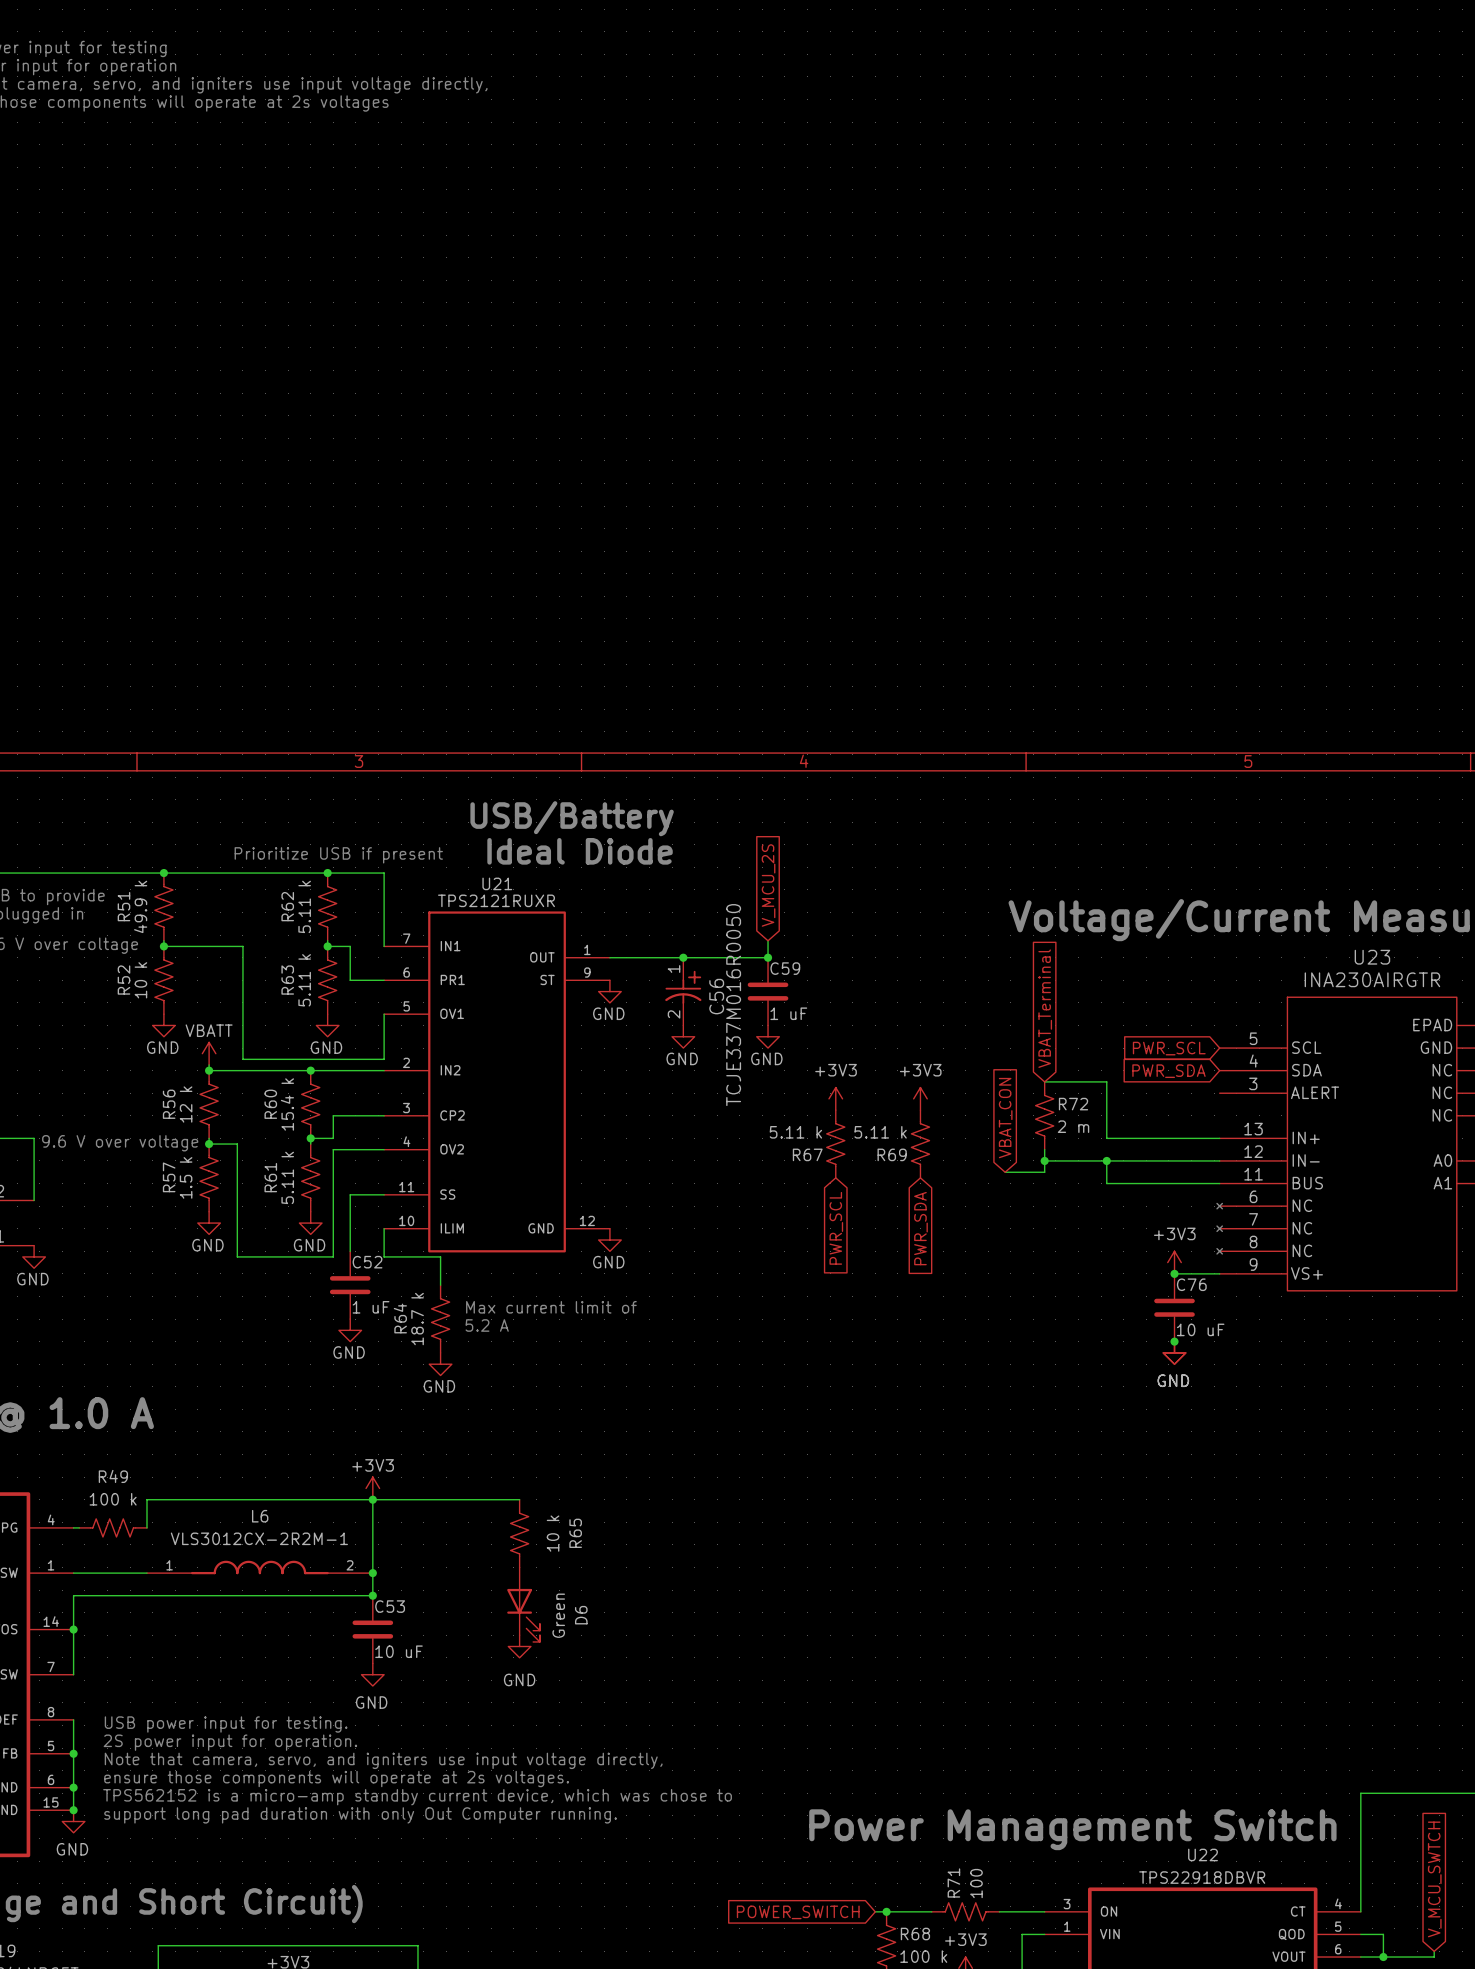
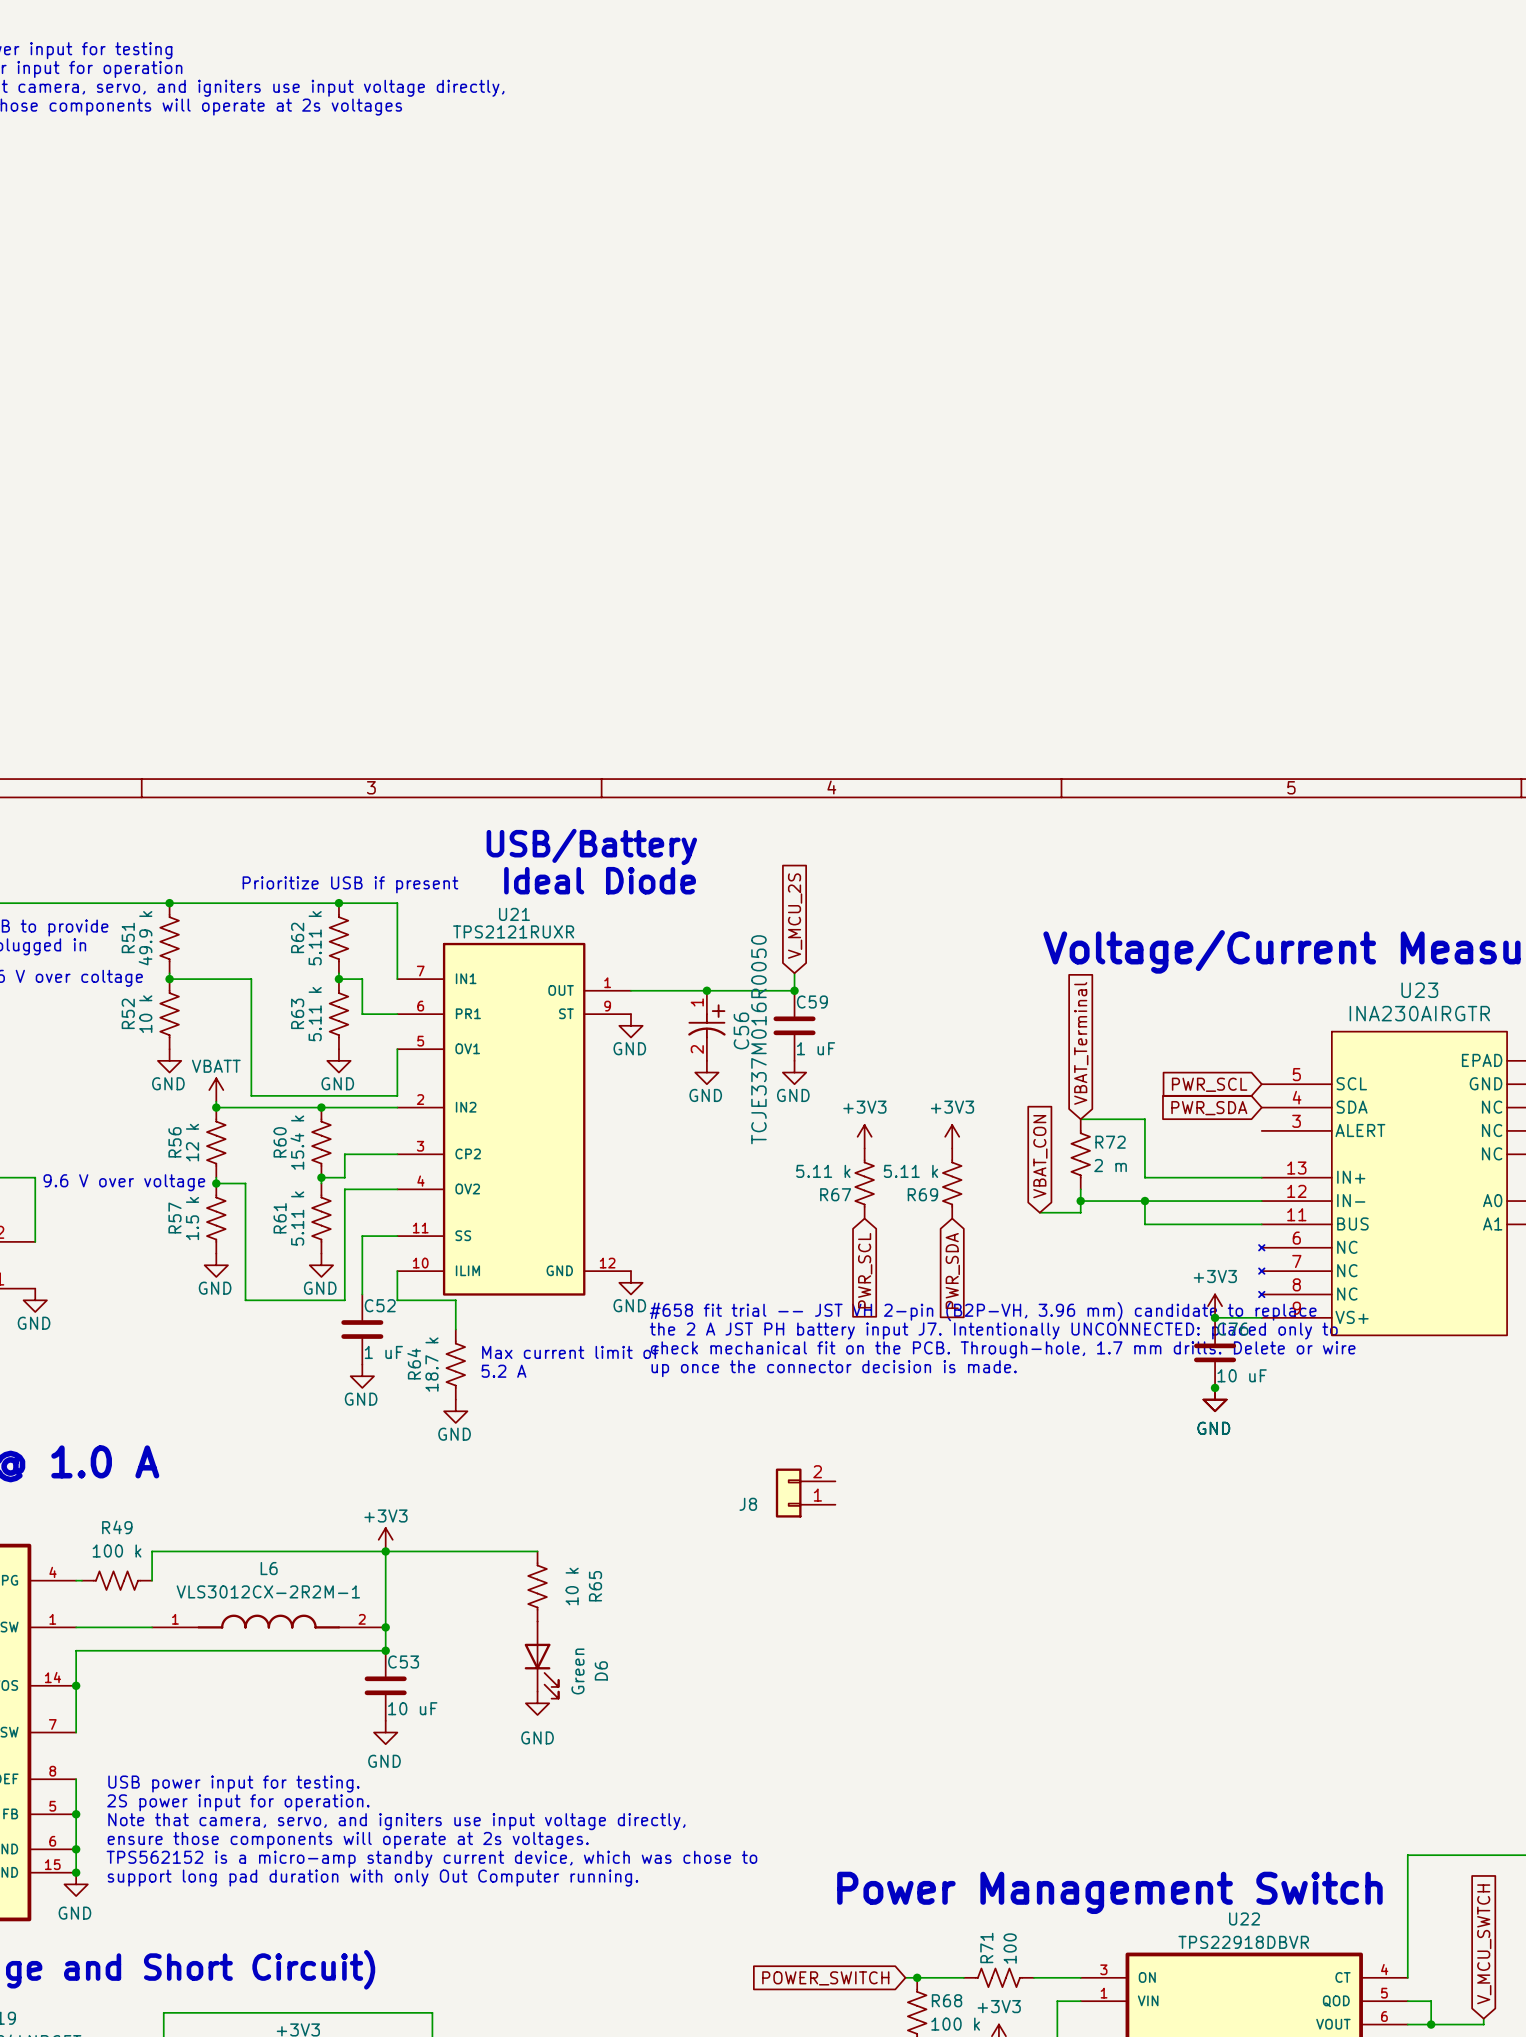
text: none -> #658 fit trial -- JST VH 2-pin (B2P-VH, 3.96 mm) candidate to replace (983, 1311)
text: none -> the 2 A JST PH battery input J7. Intentionally UNCONNECTED: placed only to (993, 1331)
text: none -> check mechanical fit on the PCB. Through-hole, 1.7 mm drills. Delete or wire (1003, 1349)
text: none -> up once the connector decision is made. (834, 1368)
J8: none -> (805, 1493)

